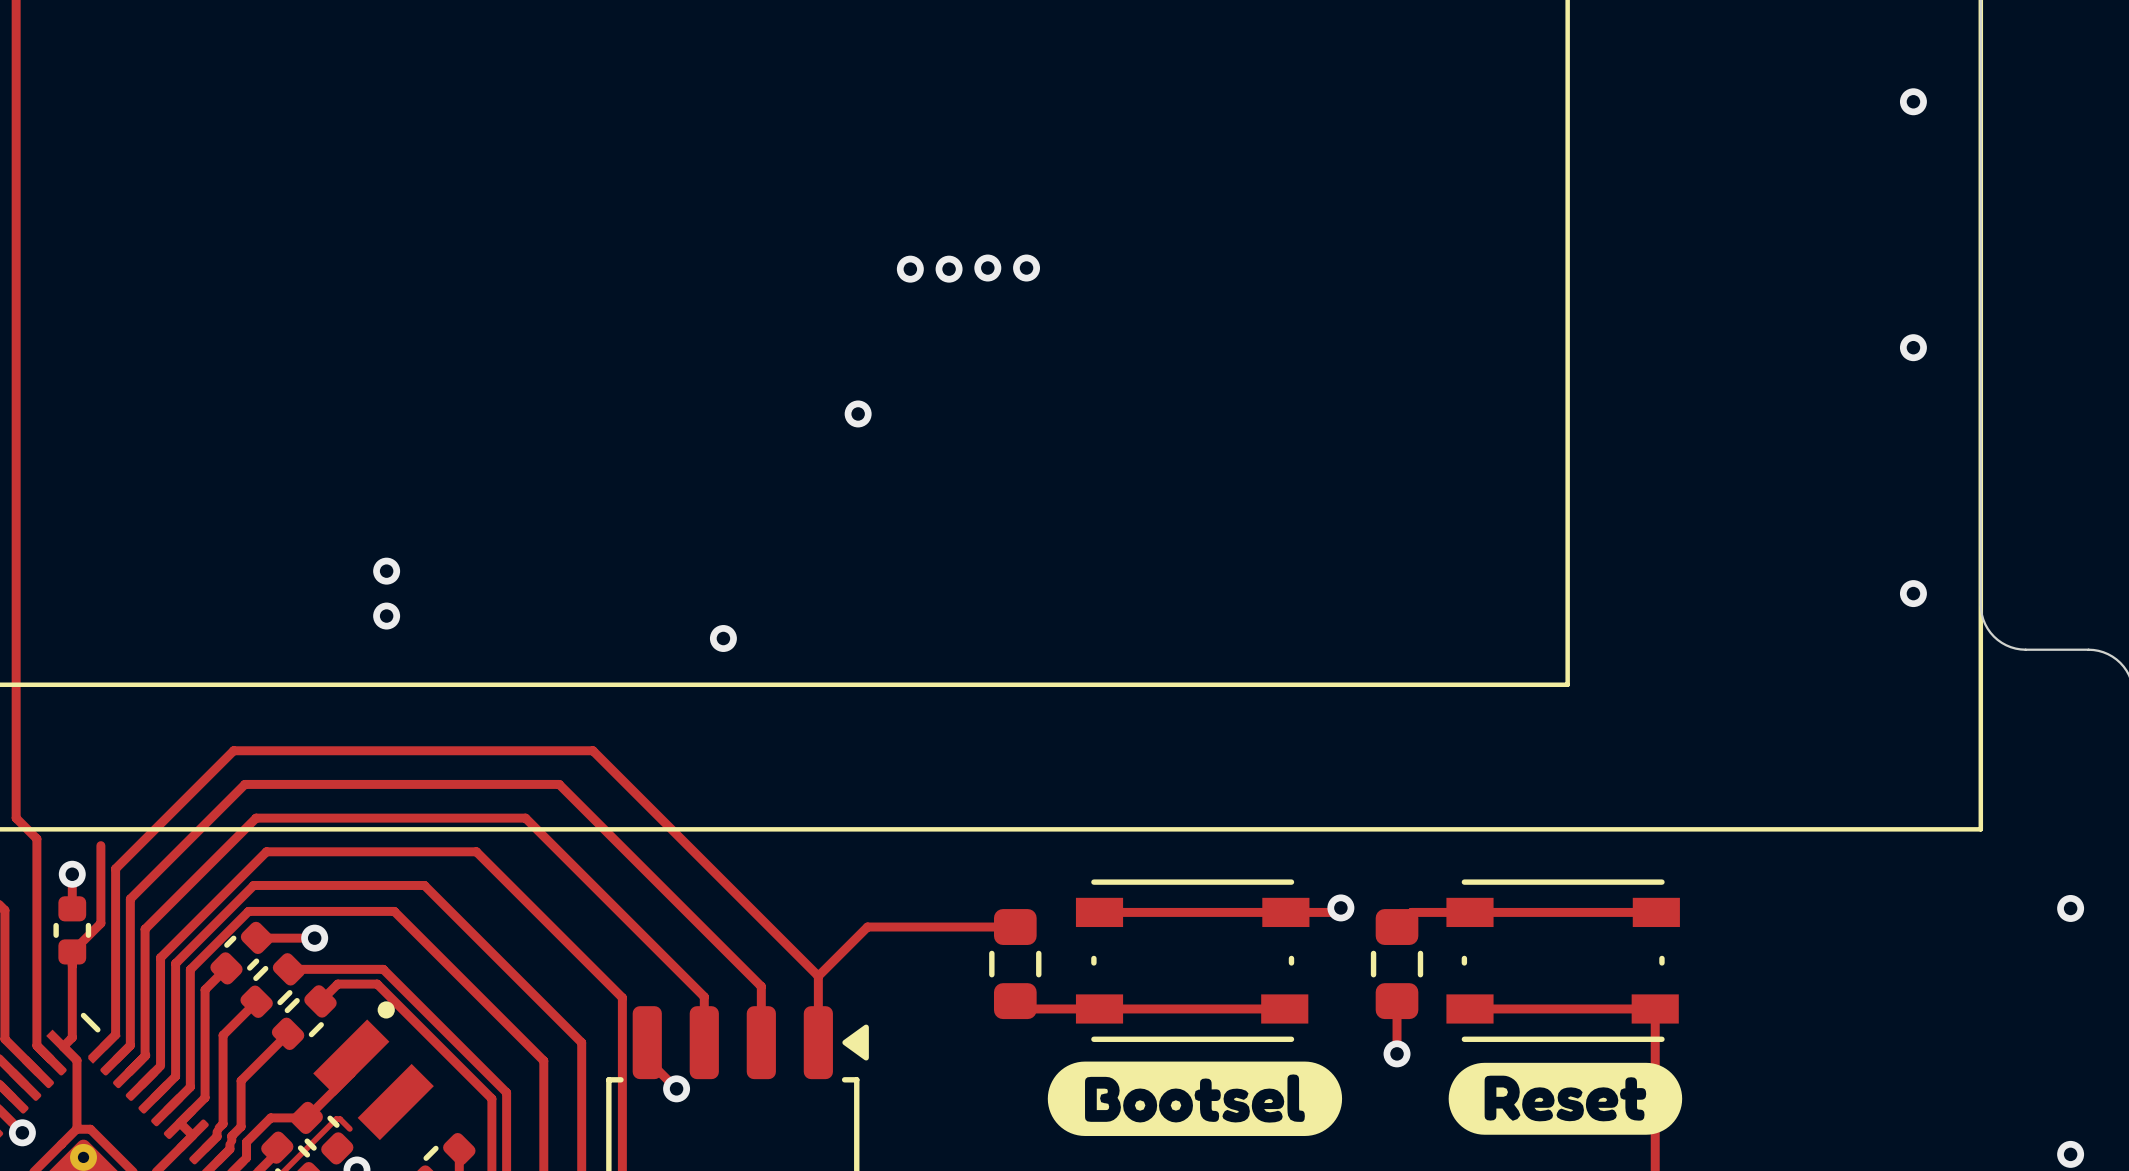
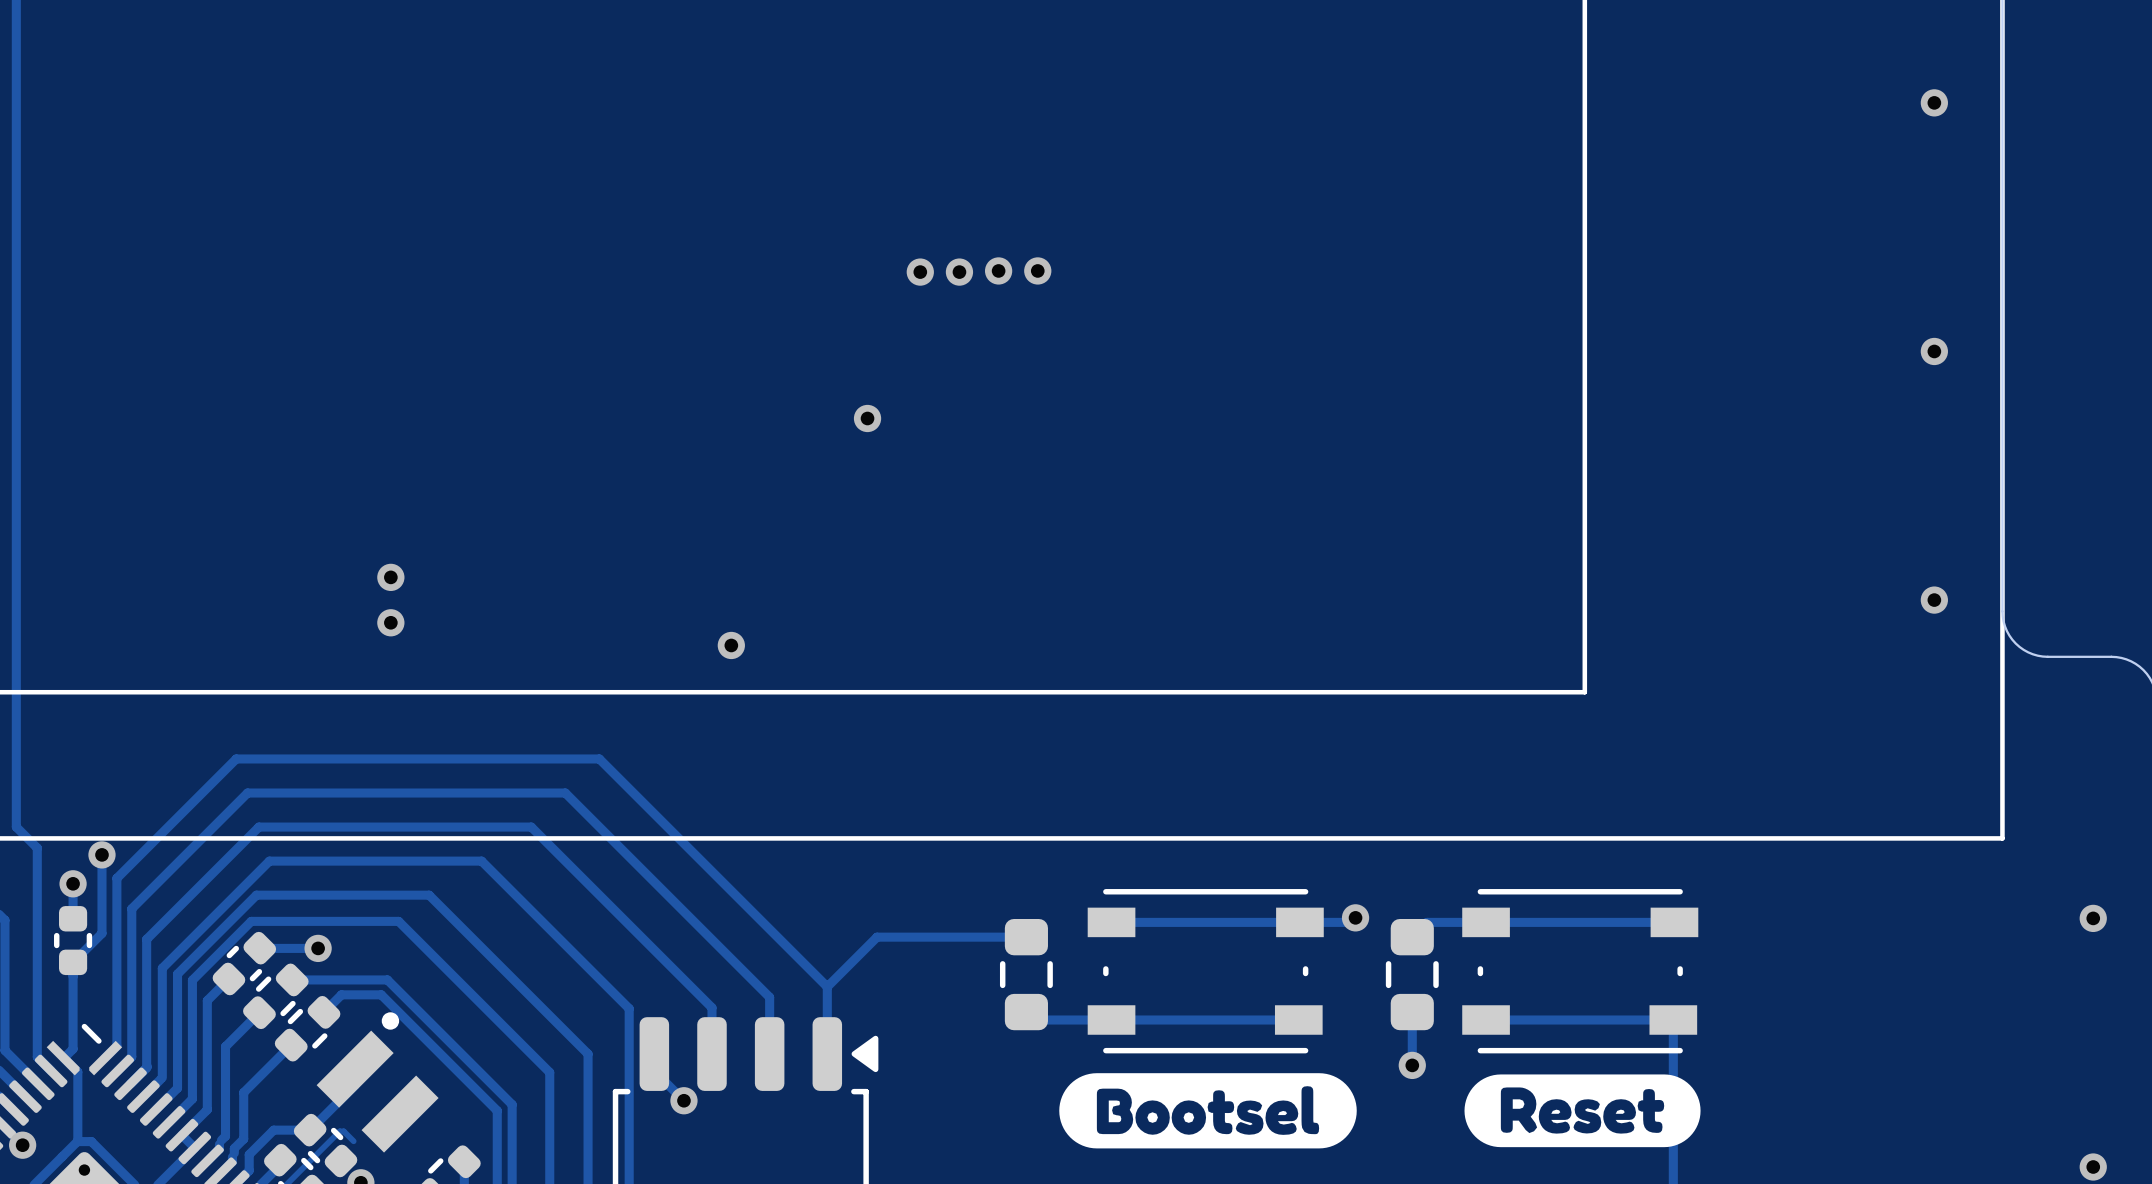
via: none -> (101, 854)

